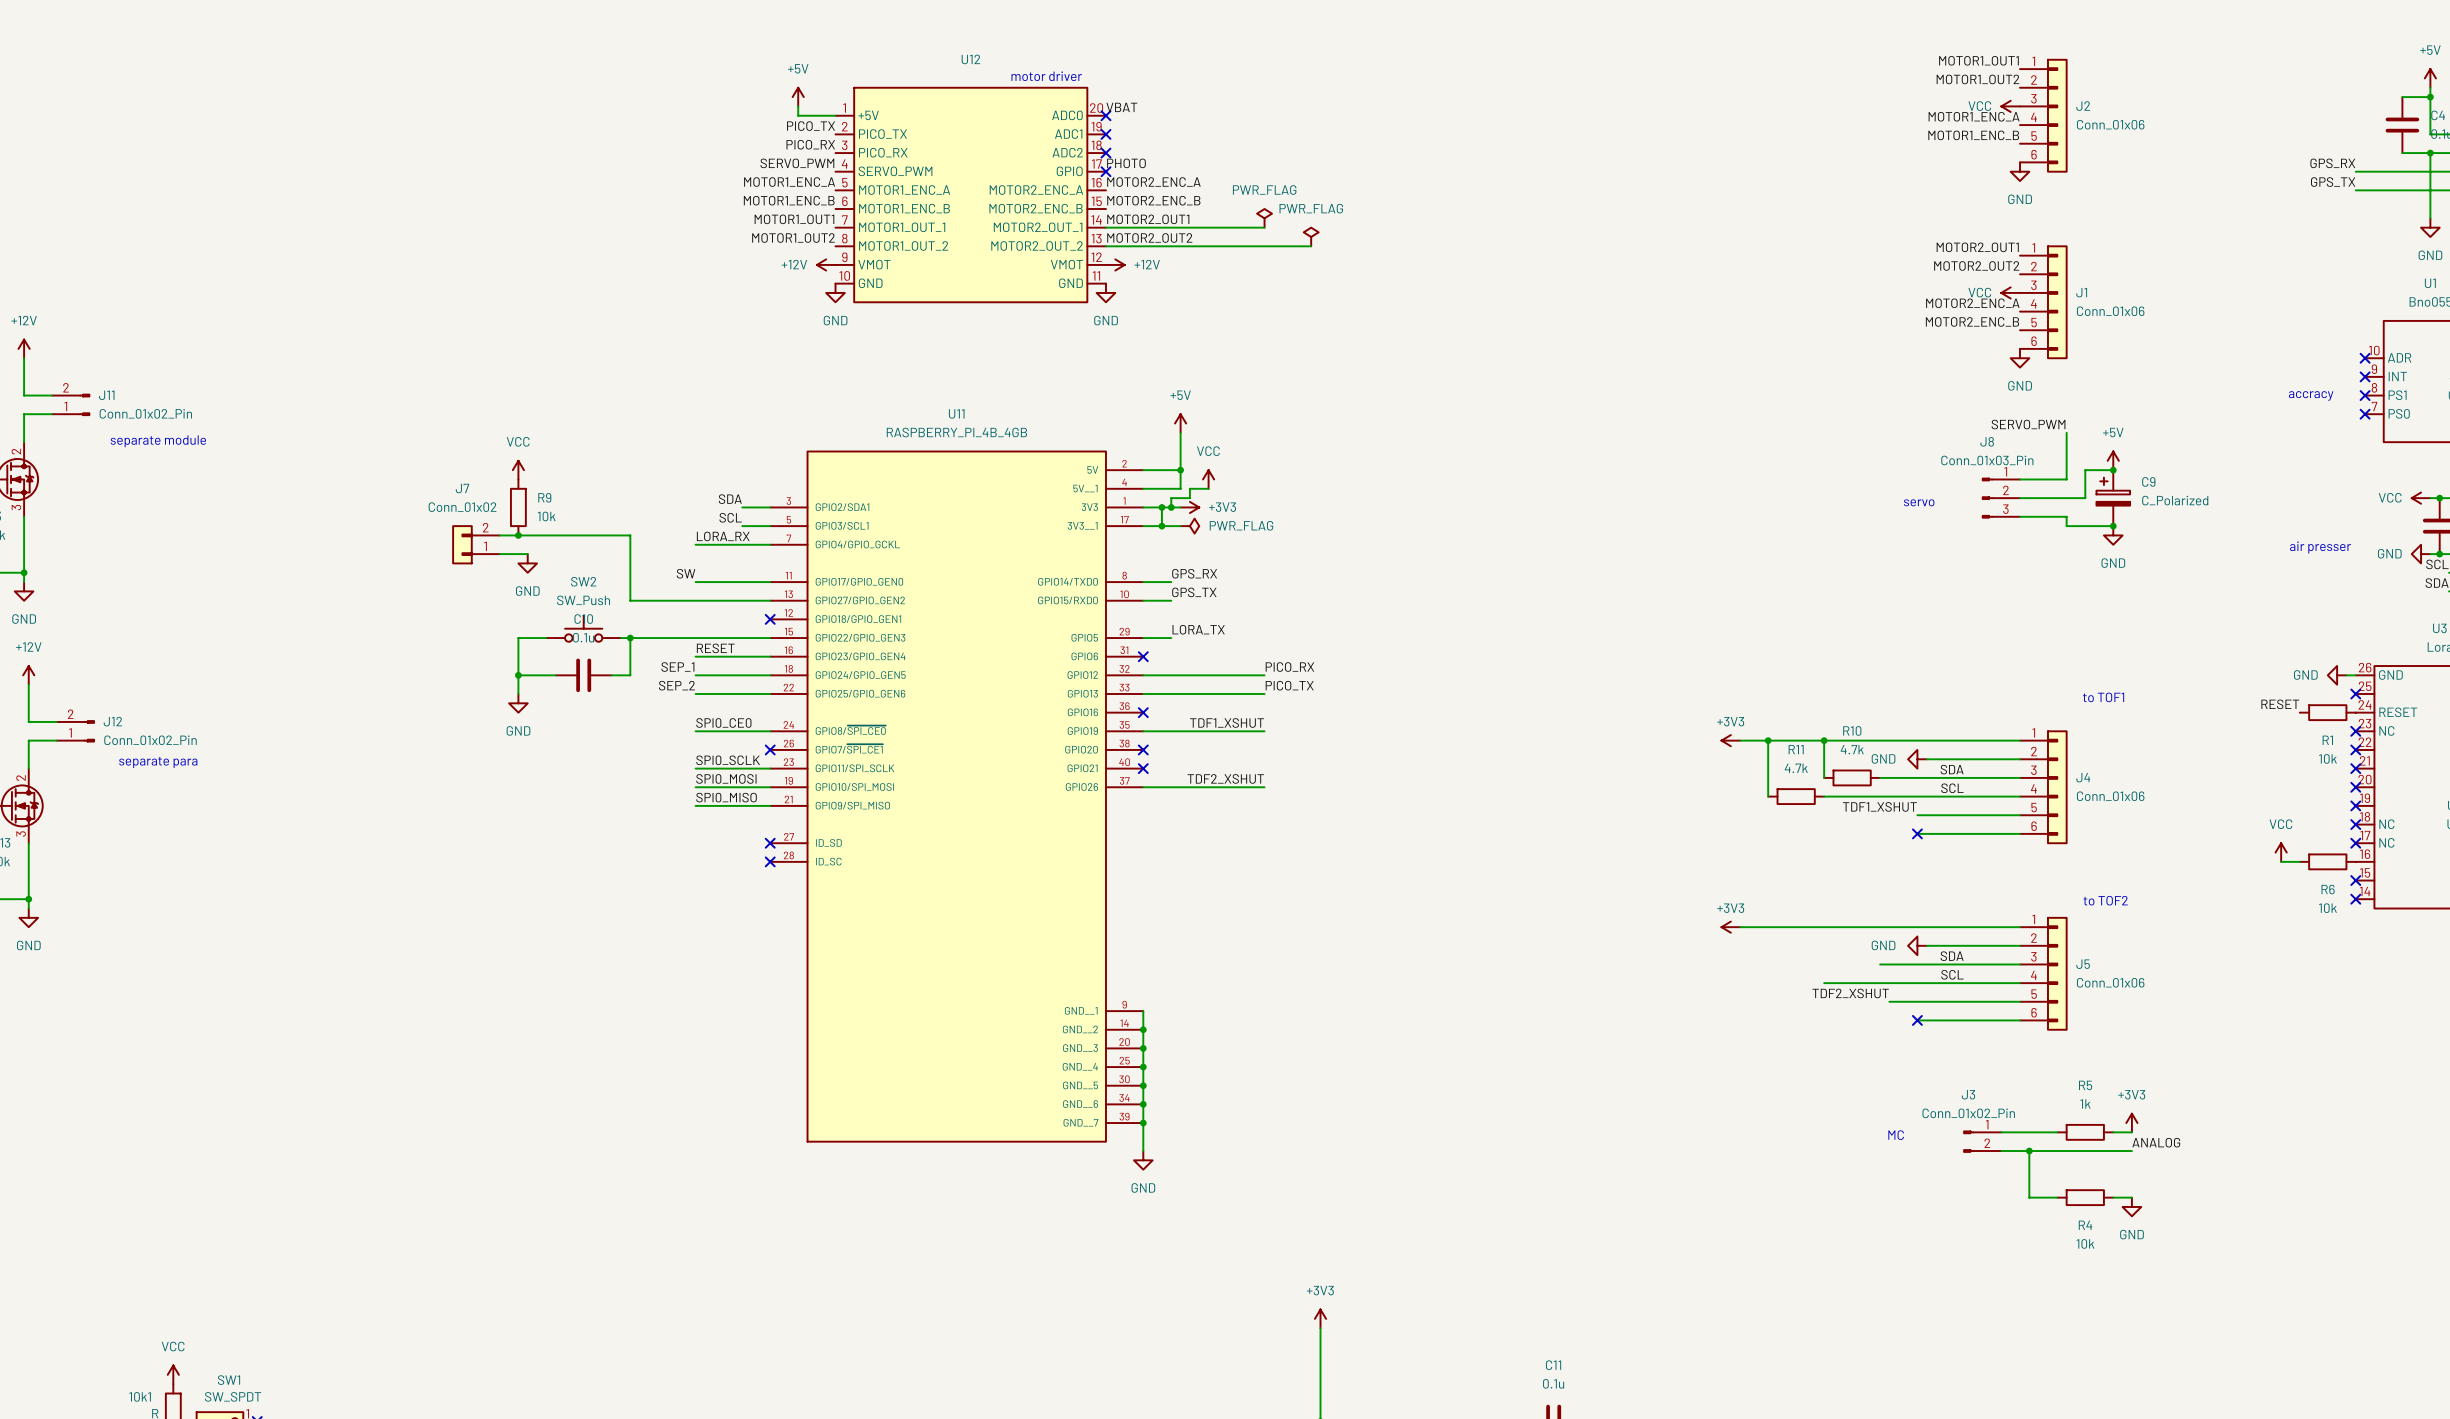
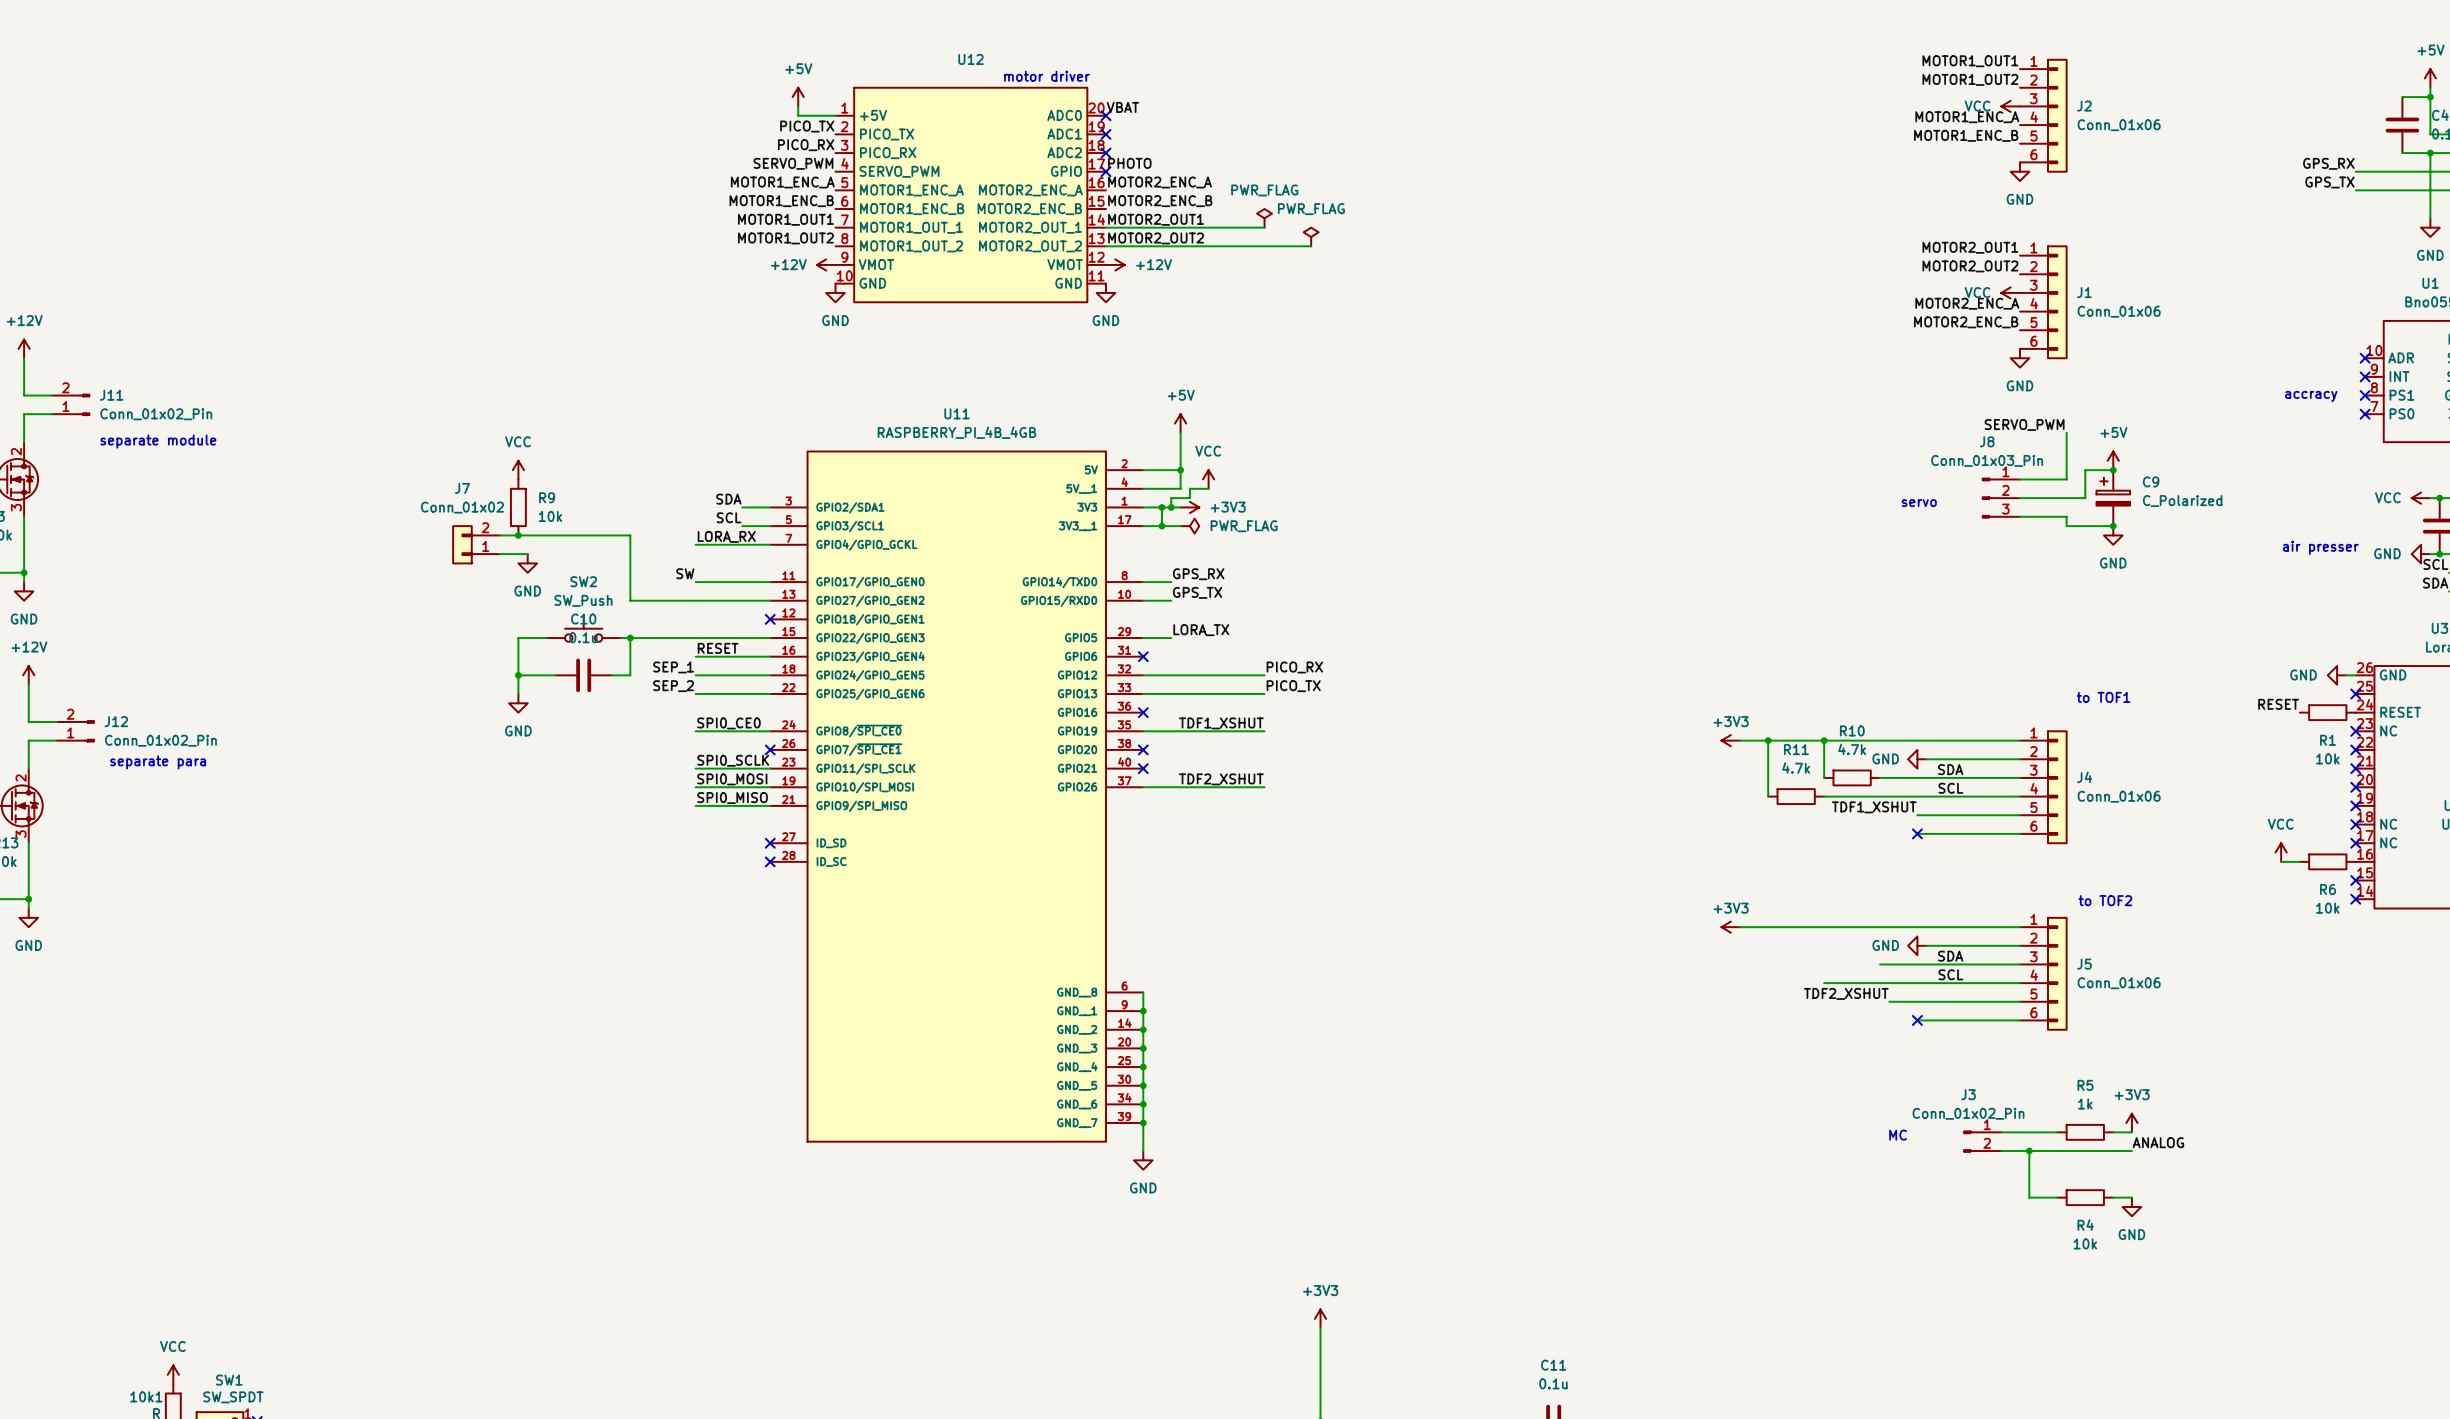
U11 symbol: [770, 450, 1144, 1143] -> [770, 450, 1144, 1143]
wire: none -> (1143, 992) (1143, 1011)
junction: none -> (1143, 1011)

